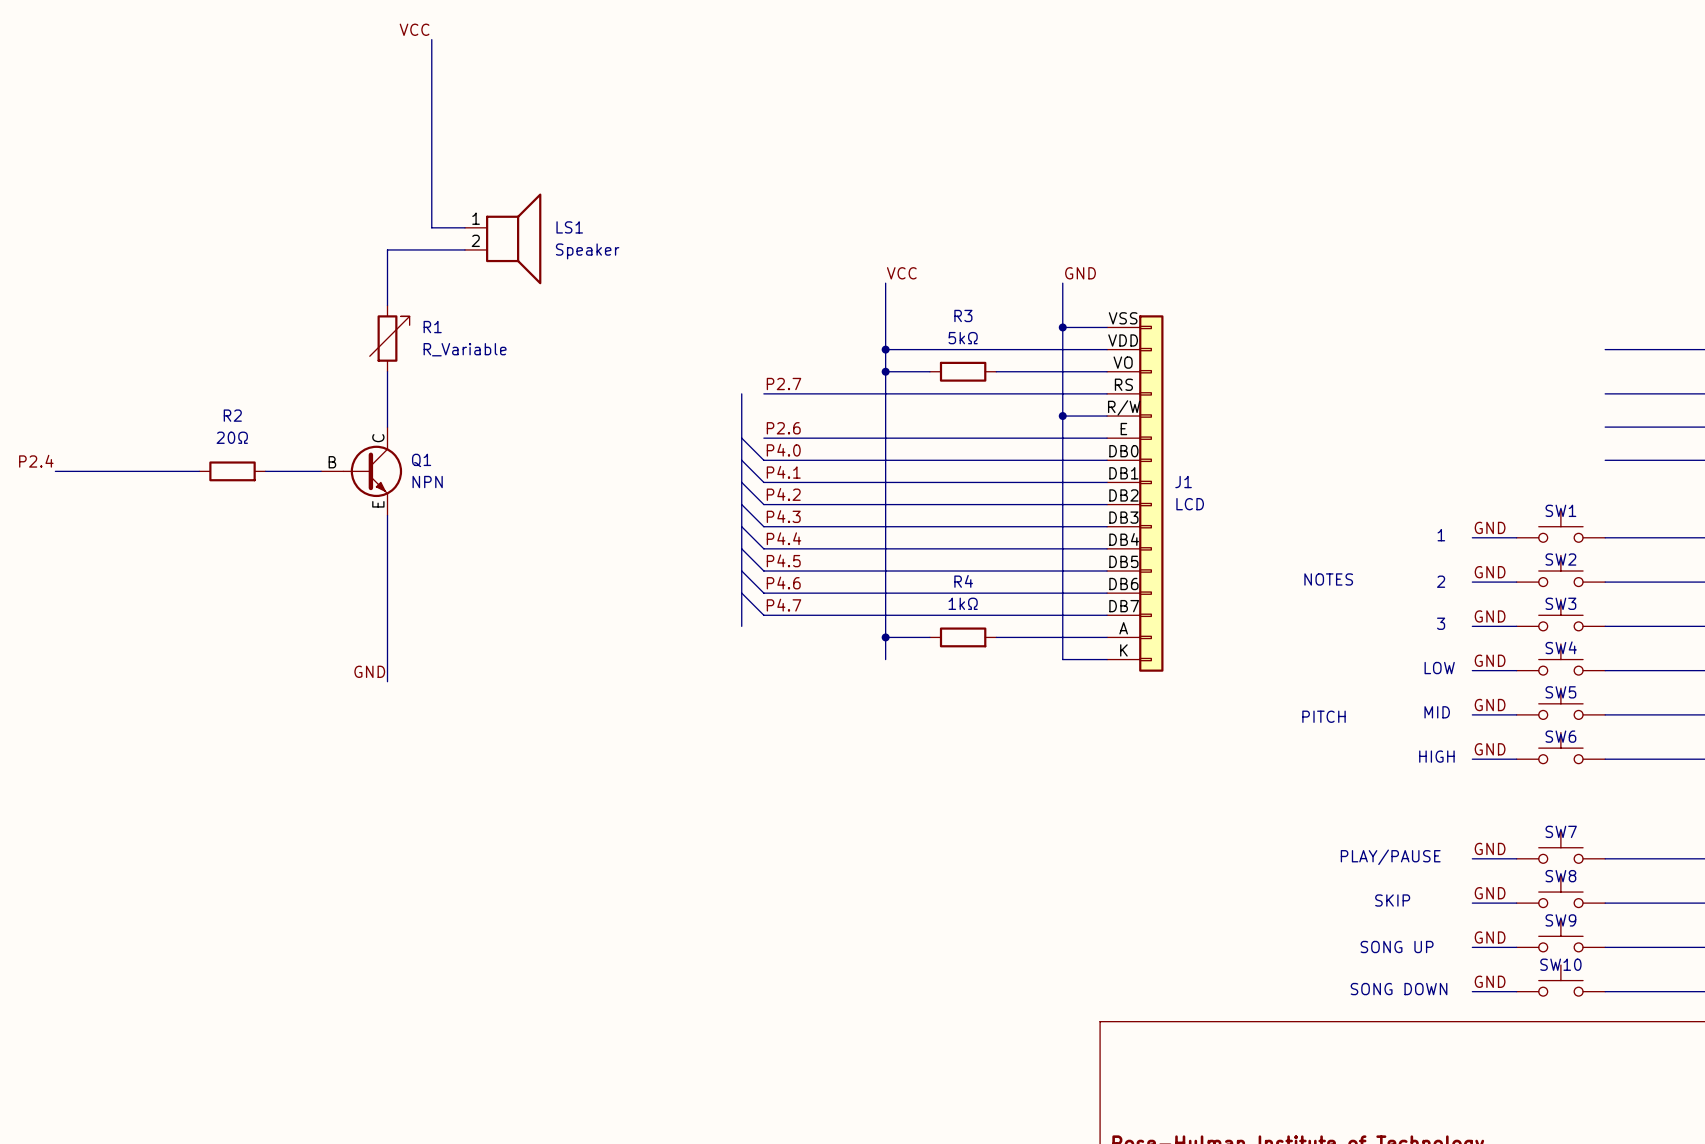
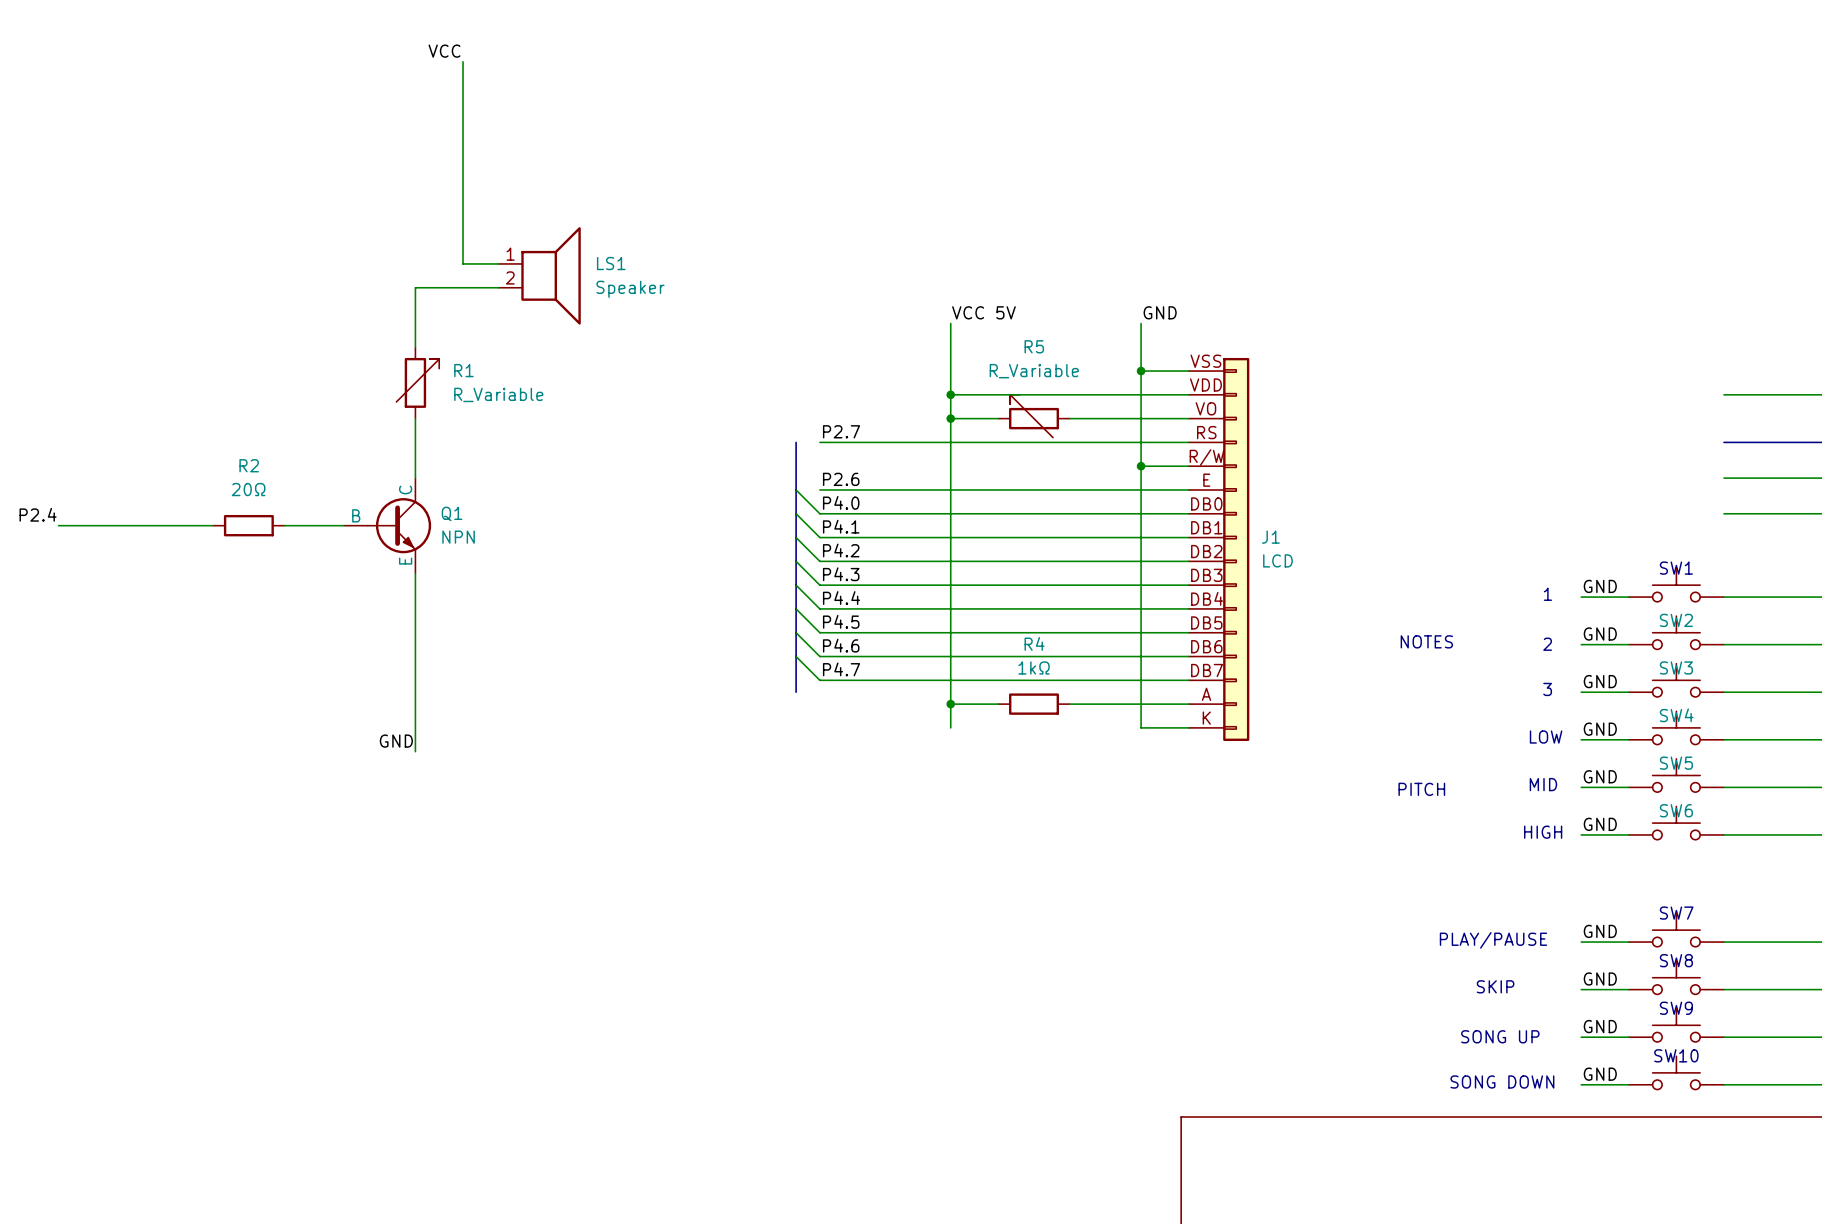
label: VCC (901, 273) -> VCC 5V (983, 312)
R5: none -> R_Variable (1034, 416)
R3: 5kΩ (963, 371) -> none

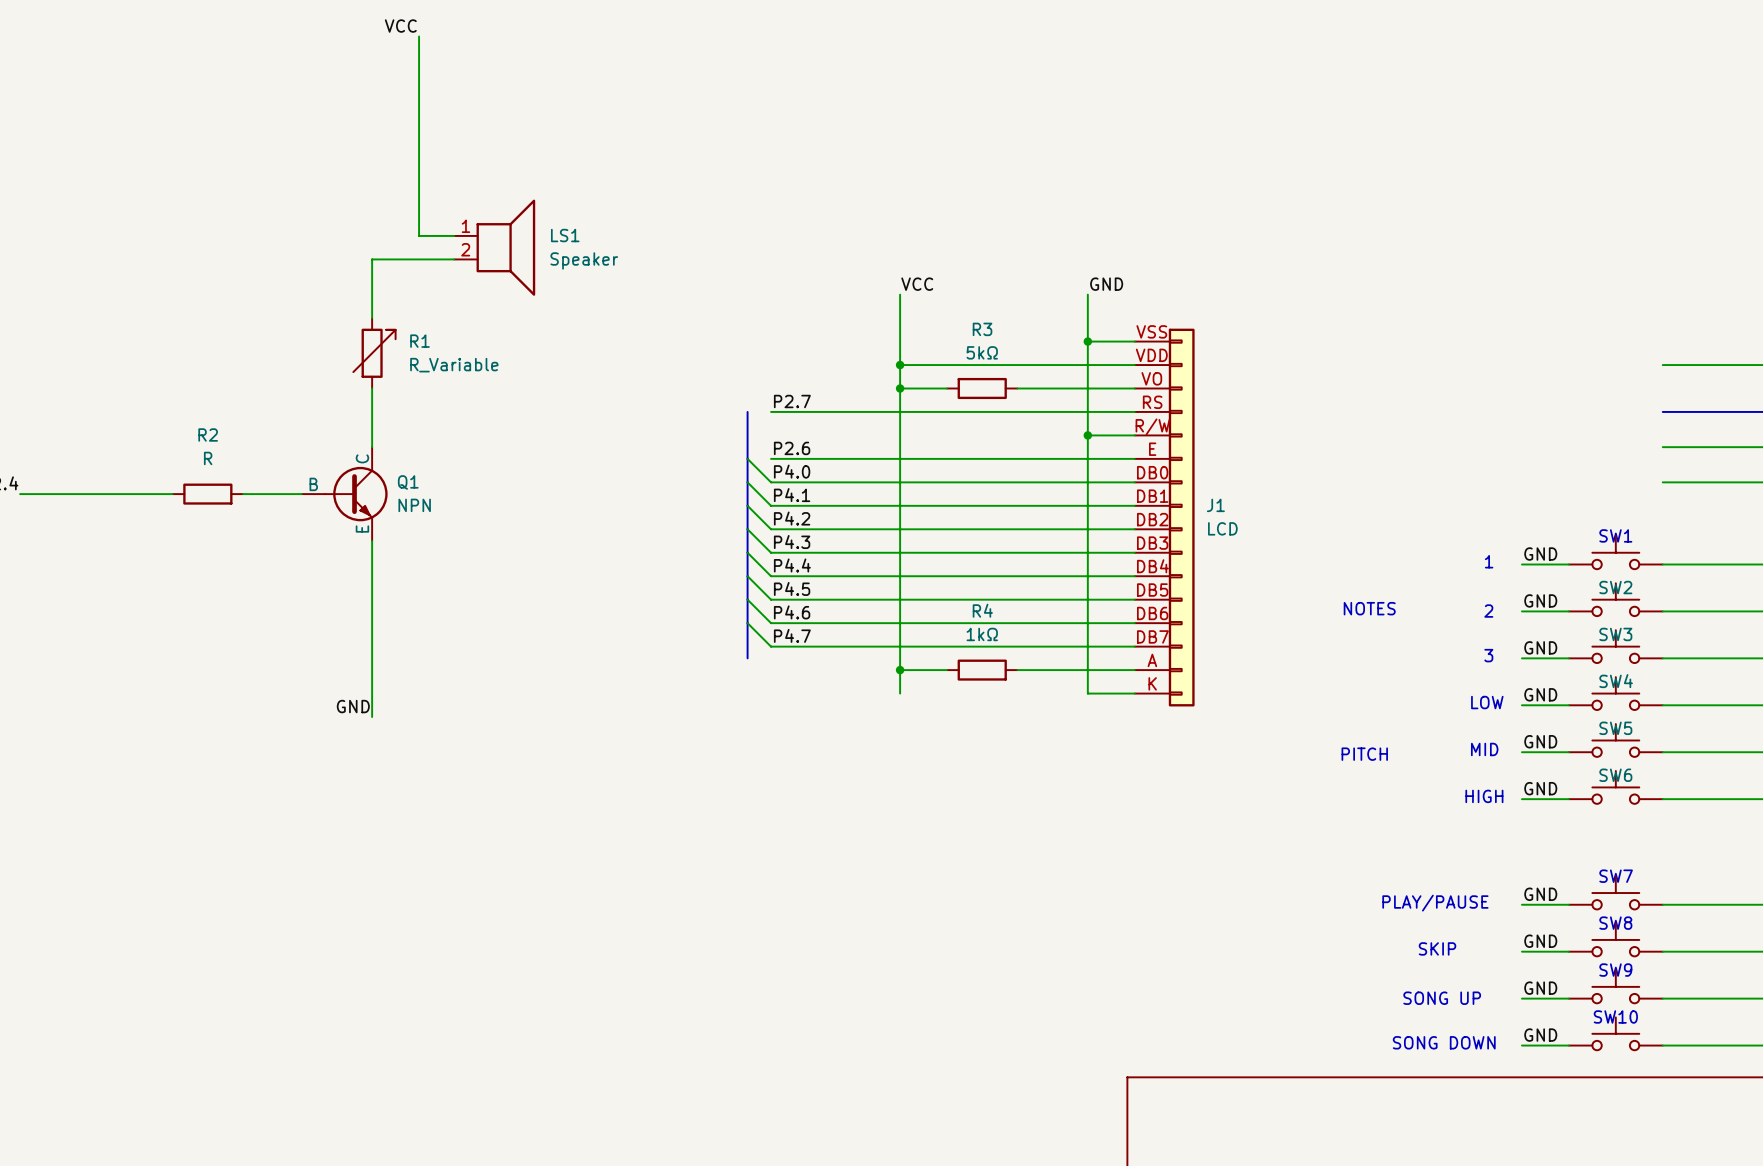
label: VCC 5V (983, 312) -> VCC (917, 284)
R5: R_Variable (1034, 416) -> none
R3: none -> 5kΩ (982, 388)
R2 value: 20Ω (248, 489) -> R (208, 458)

